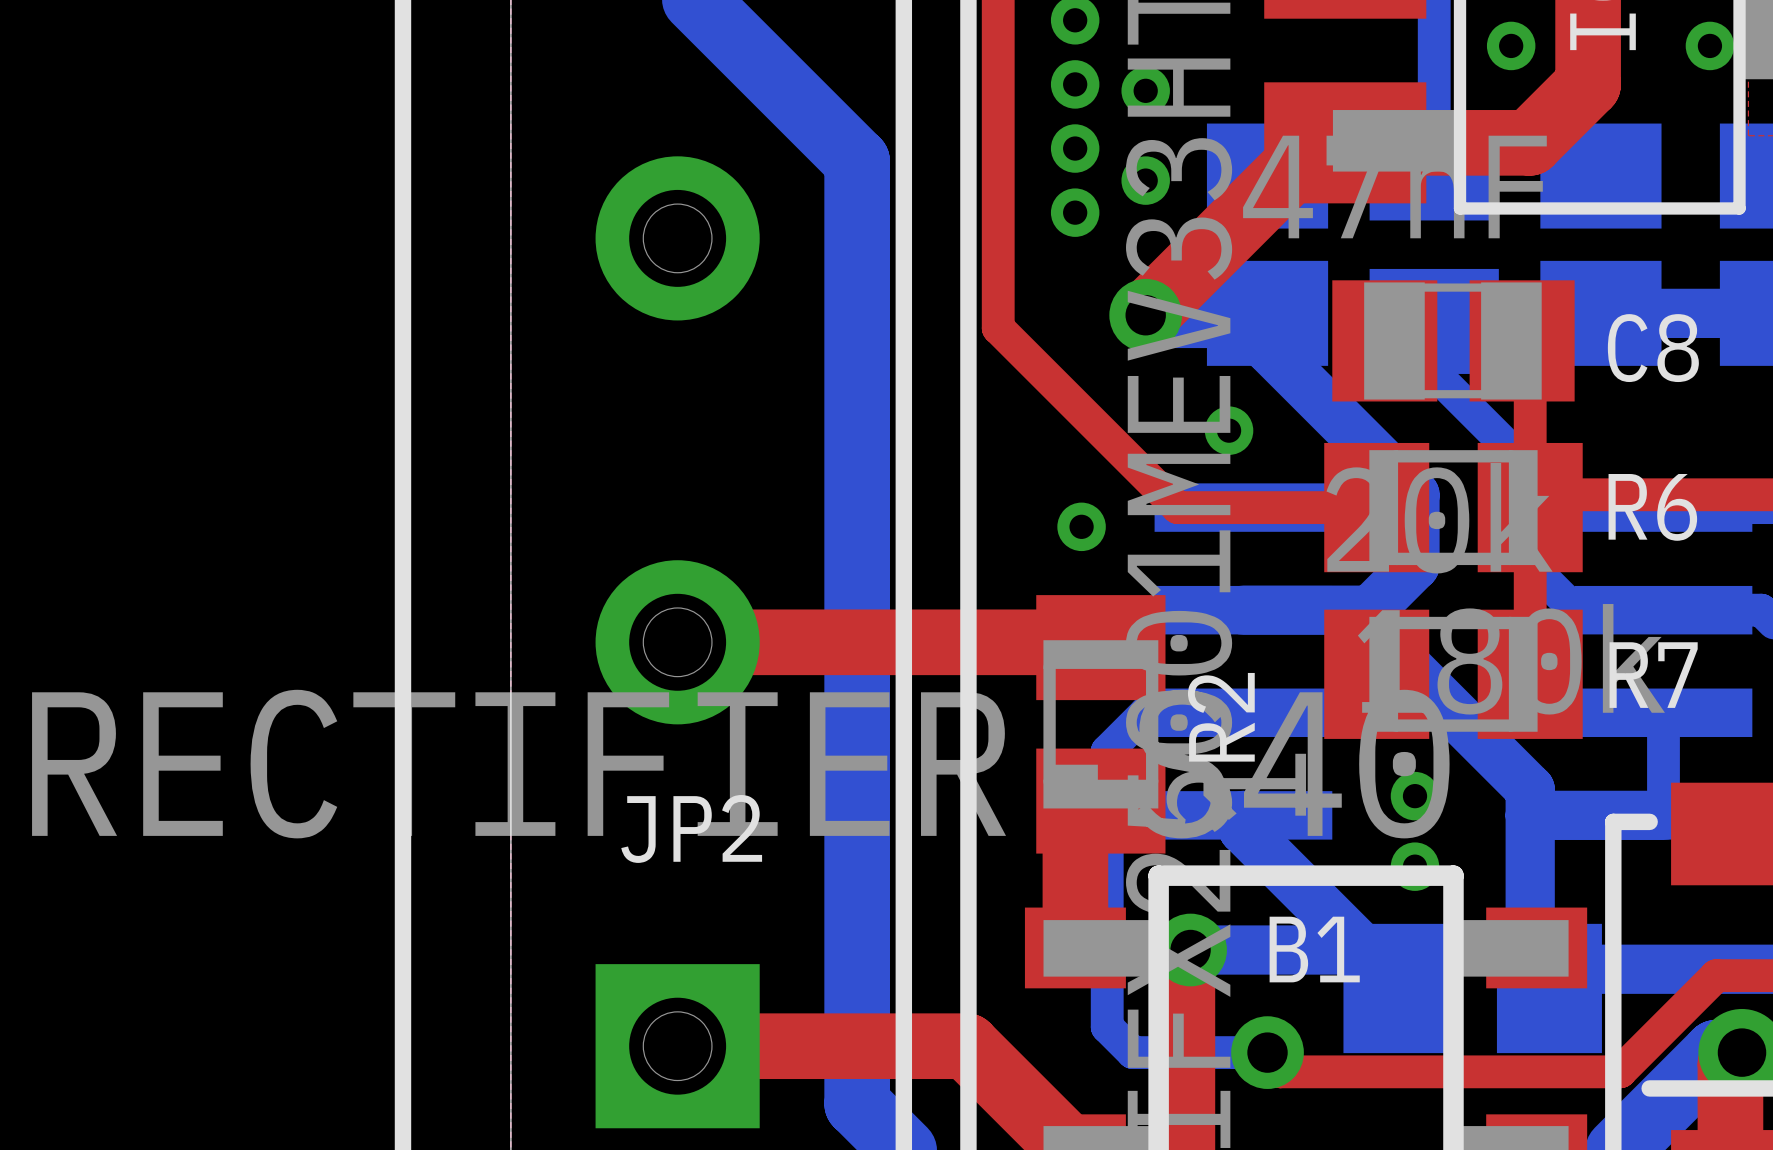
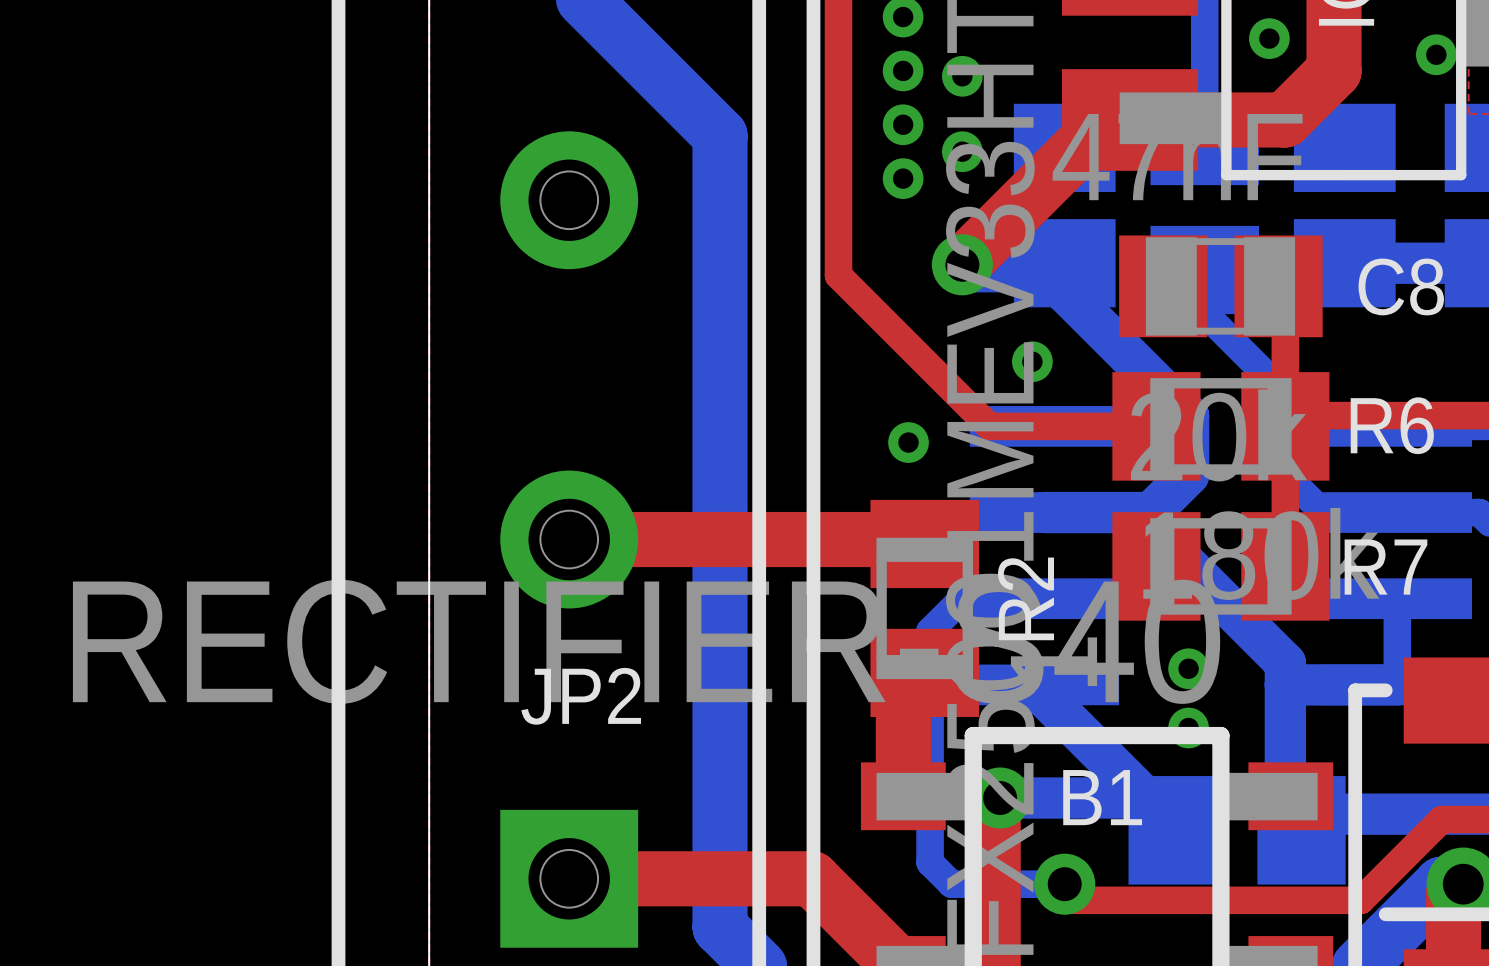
via position: (1709, 45) -> (1436, 54)
C8 name position: C8 (1653, 348) -> C8 (1401, 286)

